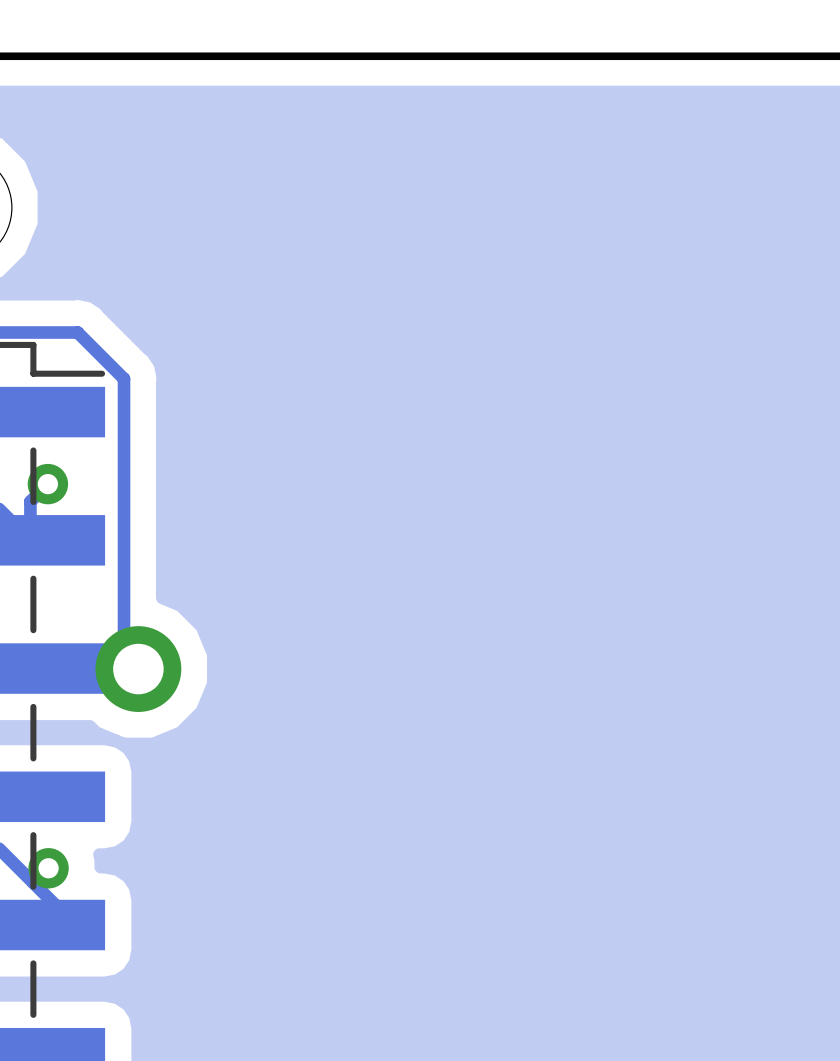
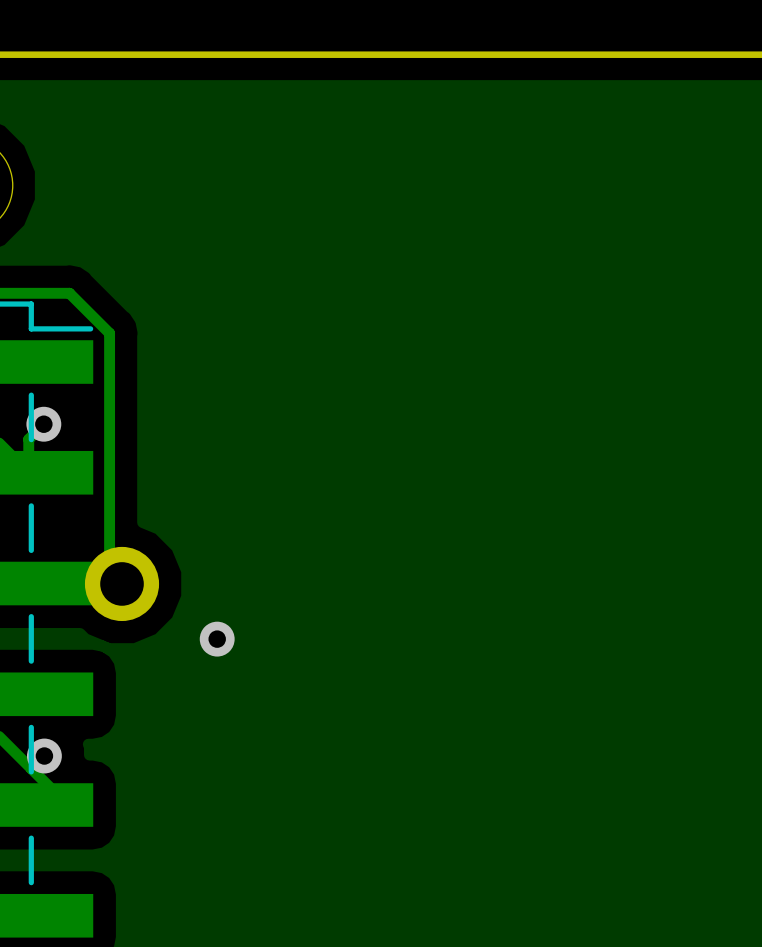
via: none -> (217, 639)

